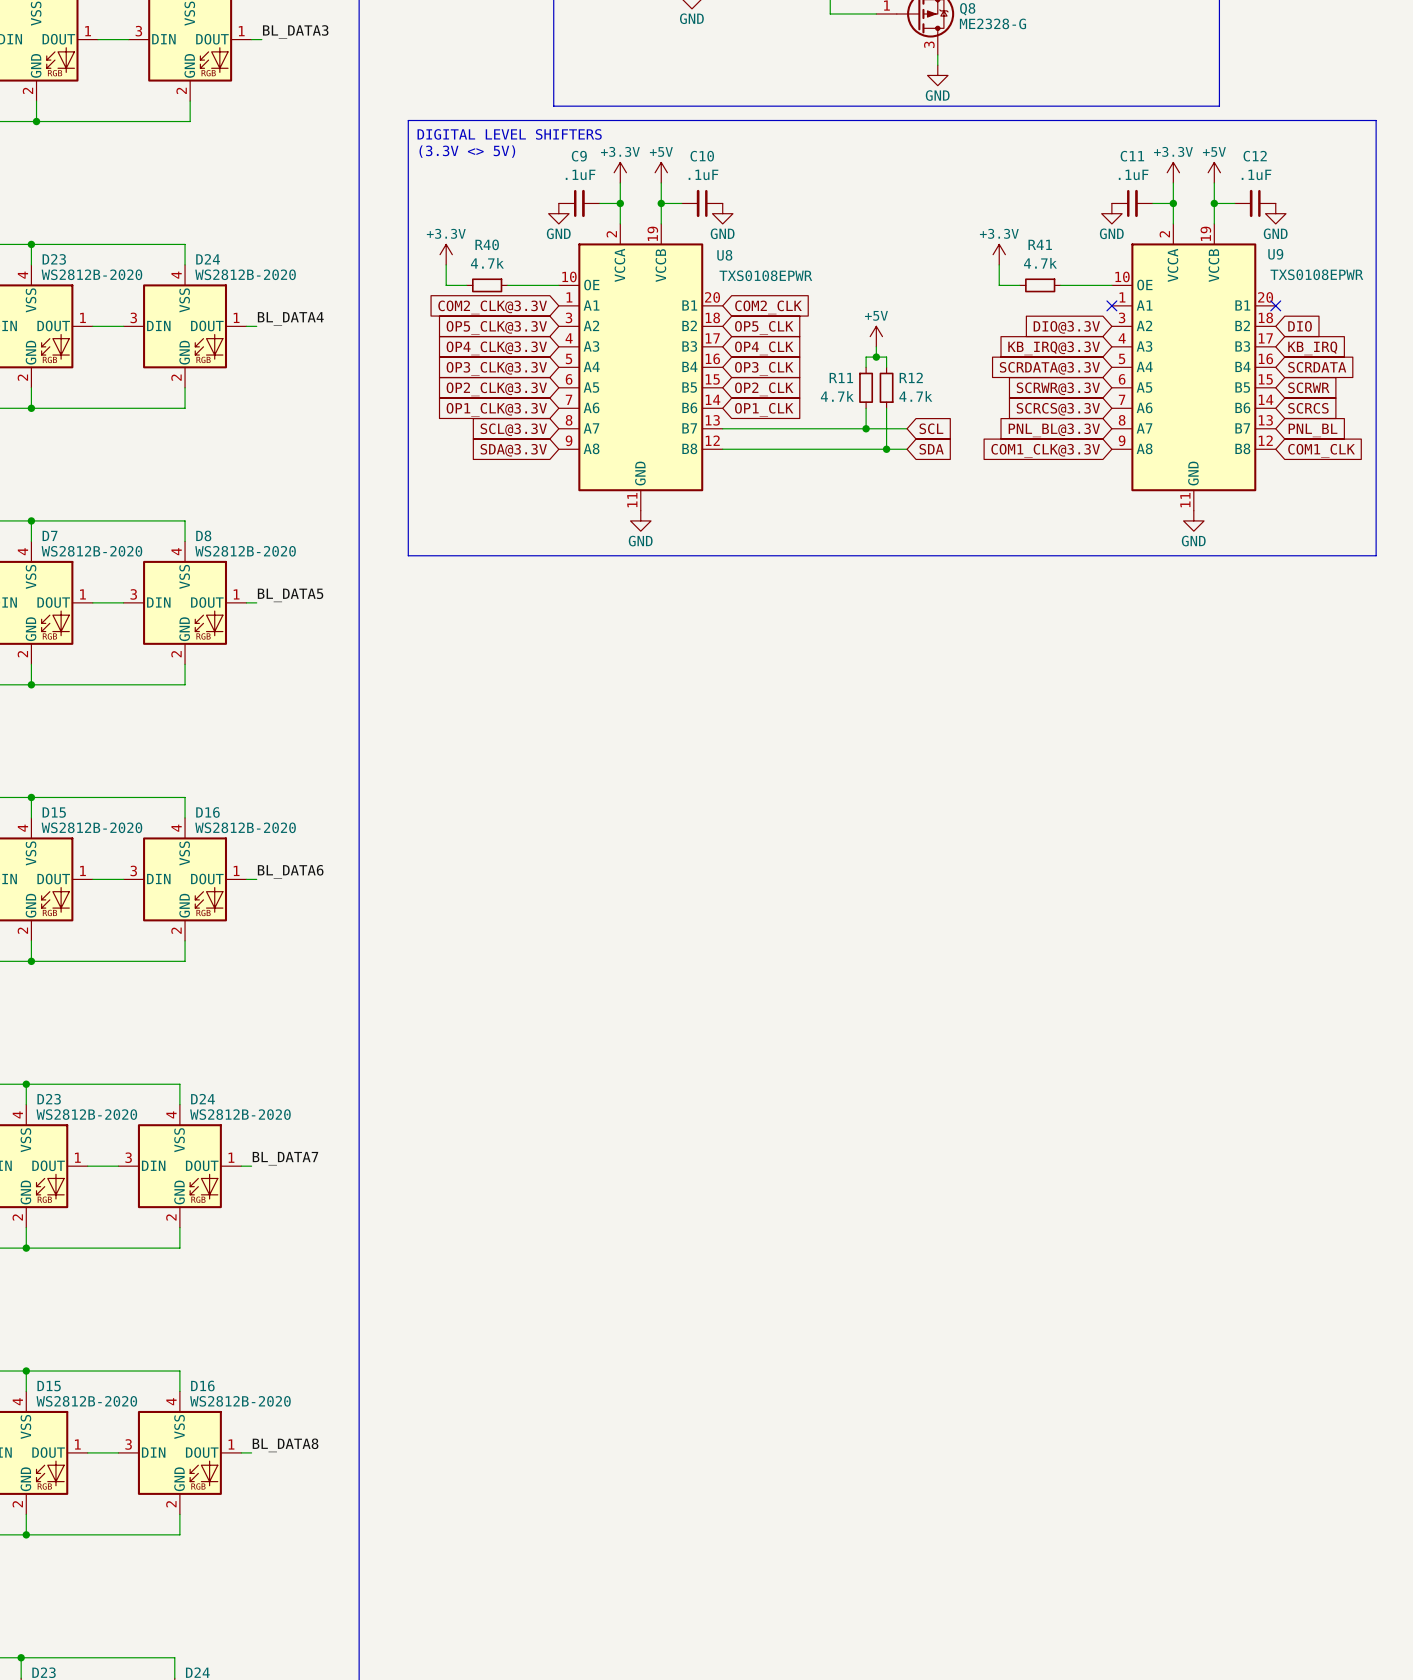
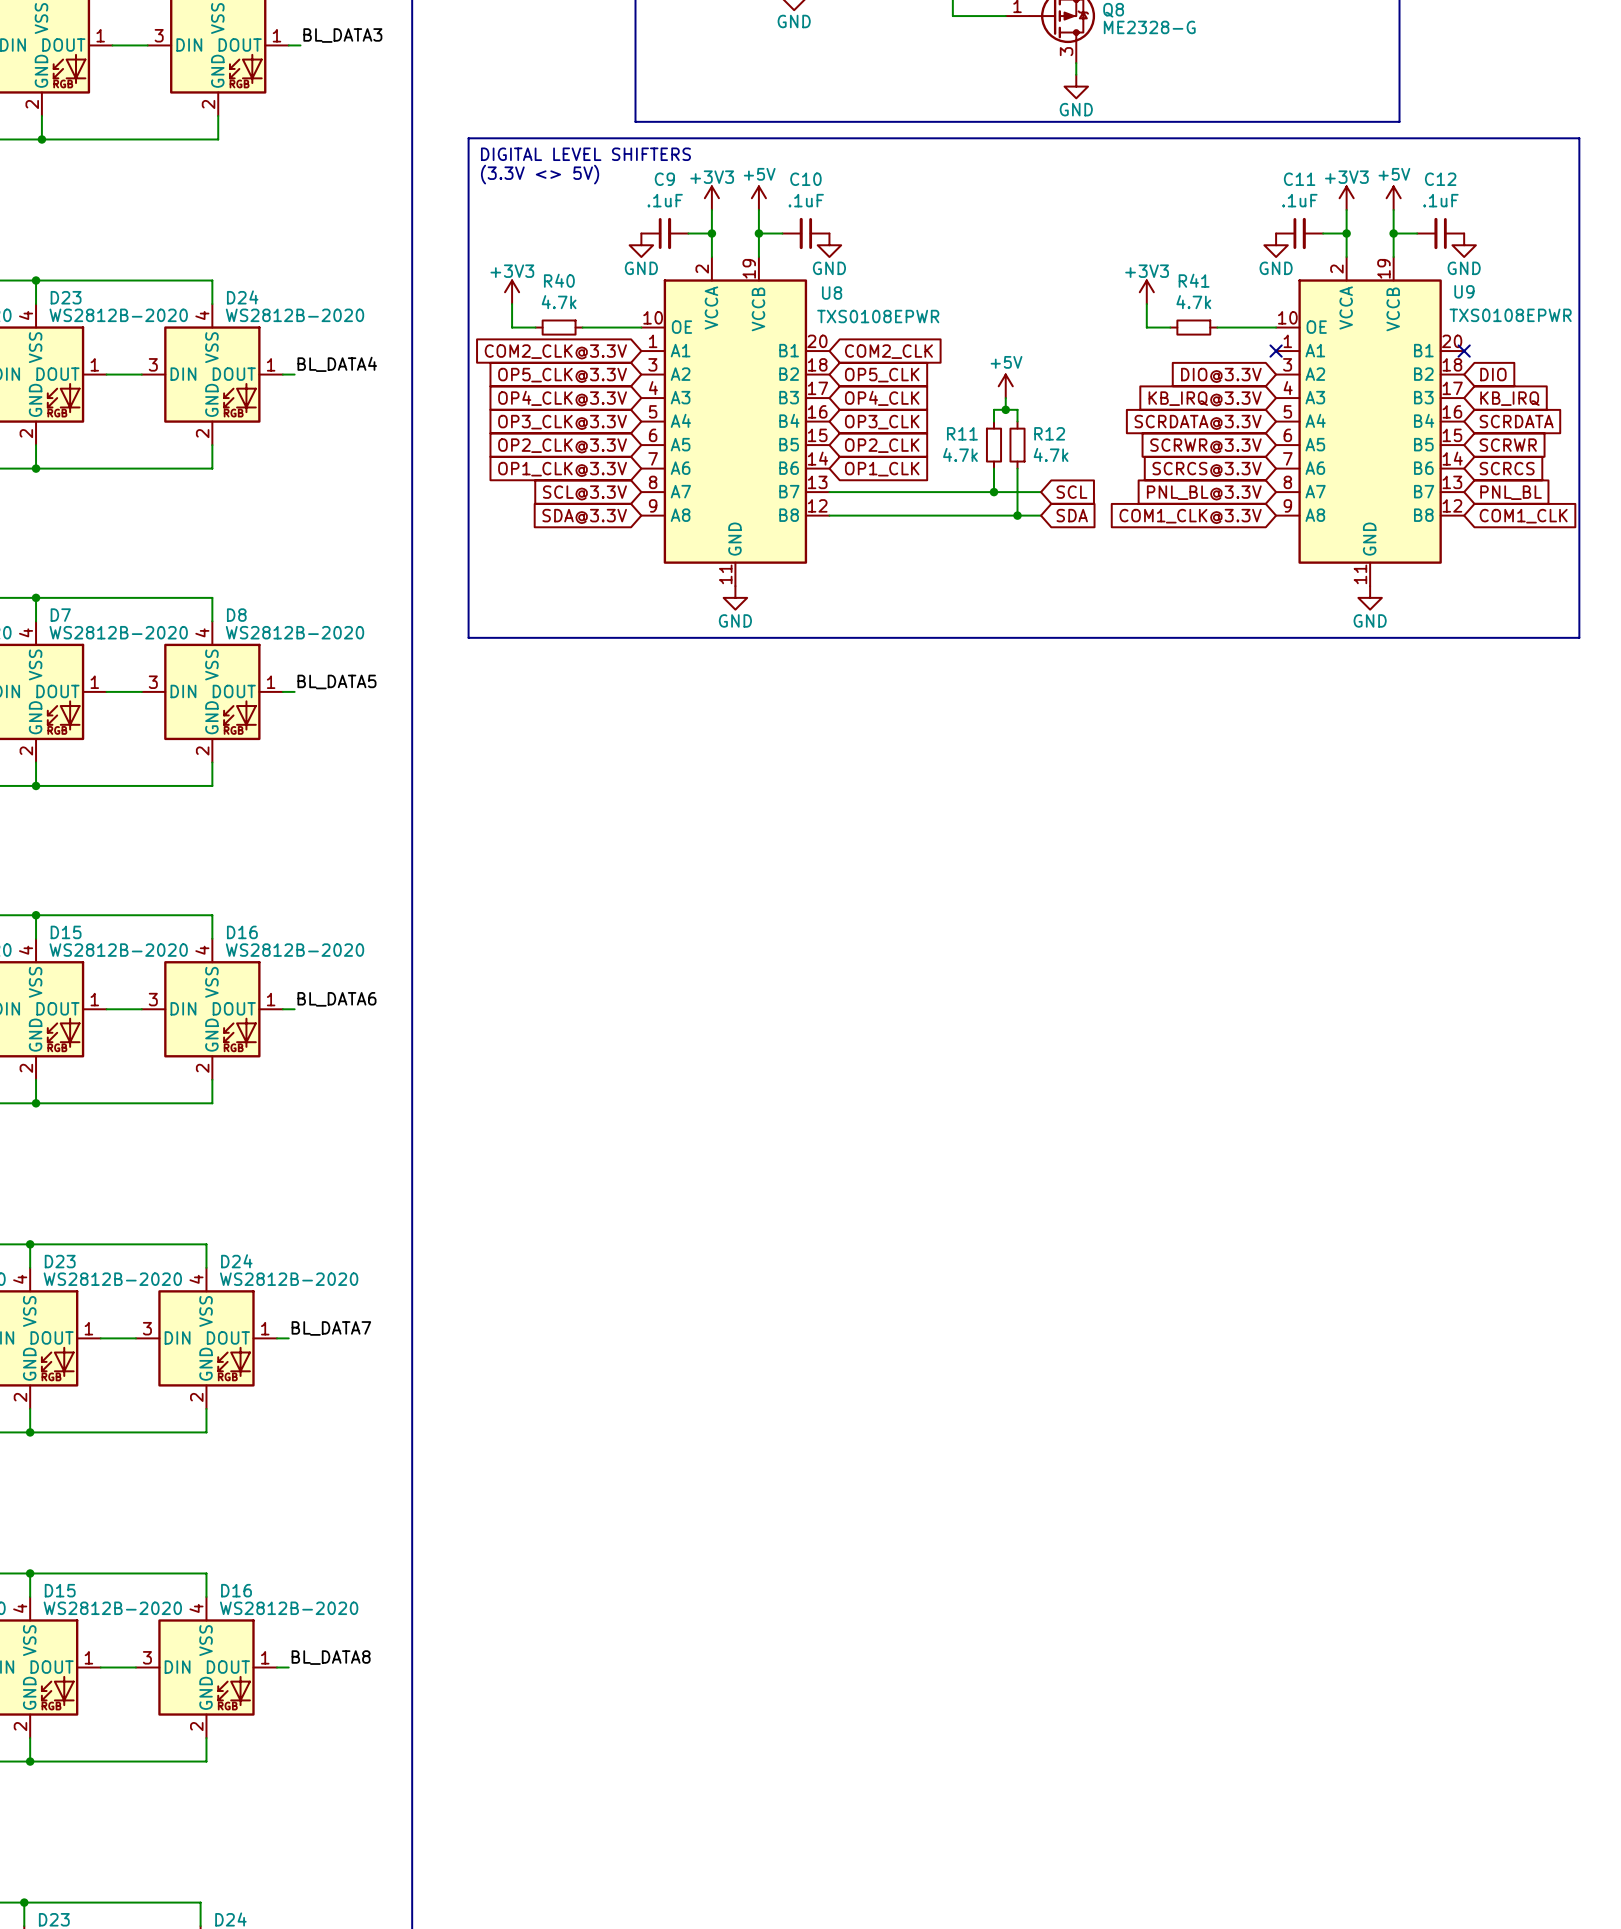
power symbol: +3.3V (620, 172) -> +3V3 (711, 198)
power symbol: +3.3V (1173, 172) -> +3V3 (1346, 198)
power symbol: +3.3V (446, 254) -> +3V3 (512, 292)
power symbol: +3.3V (999, 254) -> +3V3 (1146, 292)

